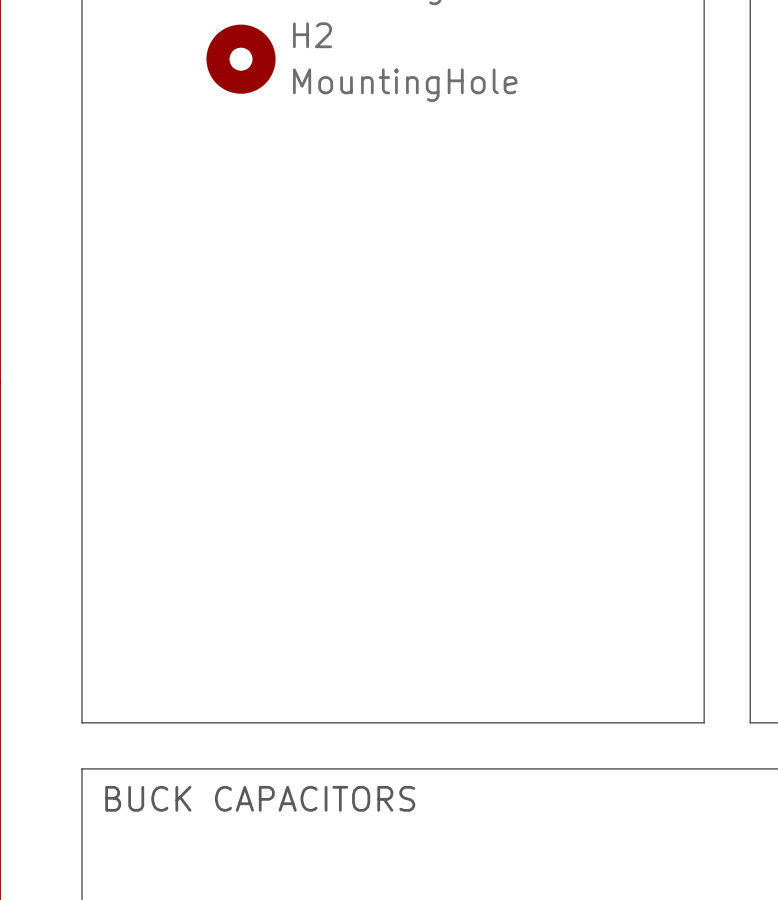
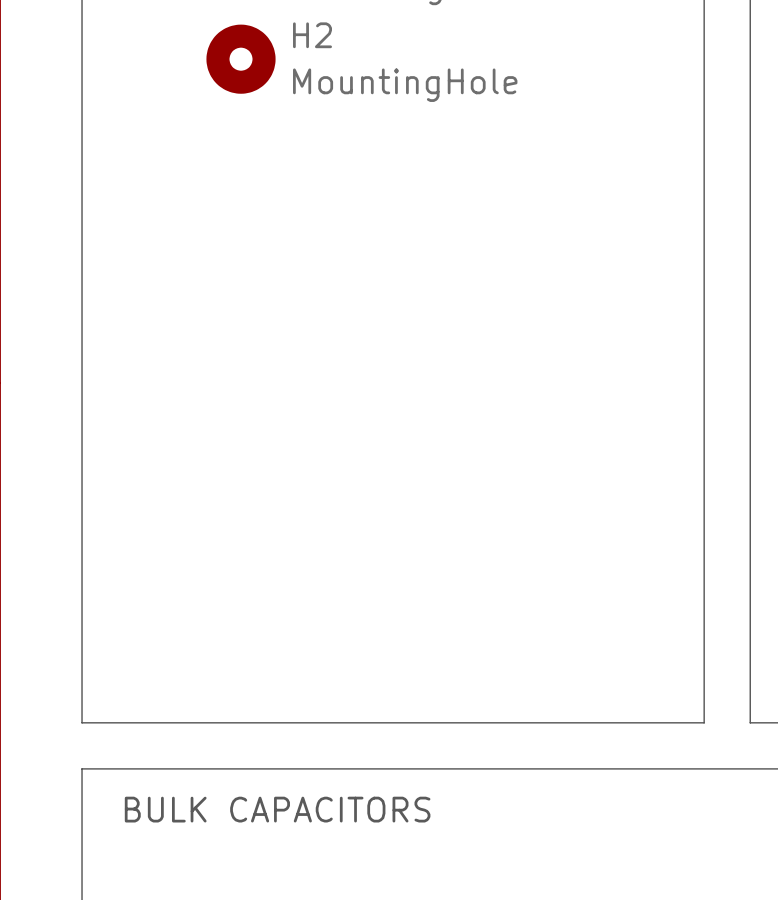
text: BUCK CAPACITORS (260, 798) -> BULK CAPACITORS (277, 809)

